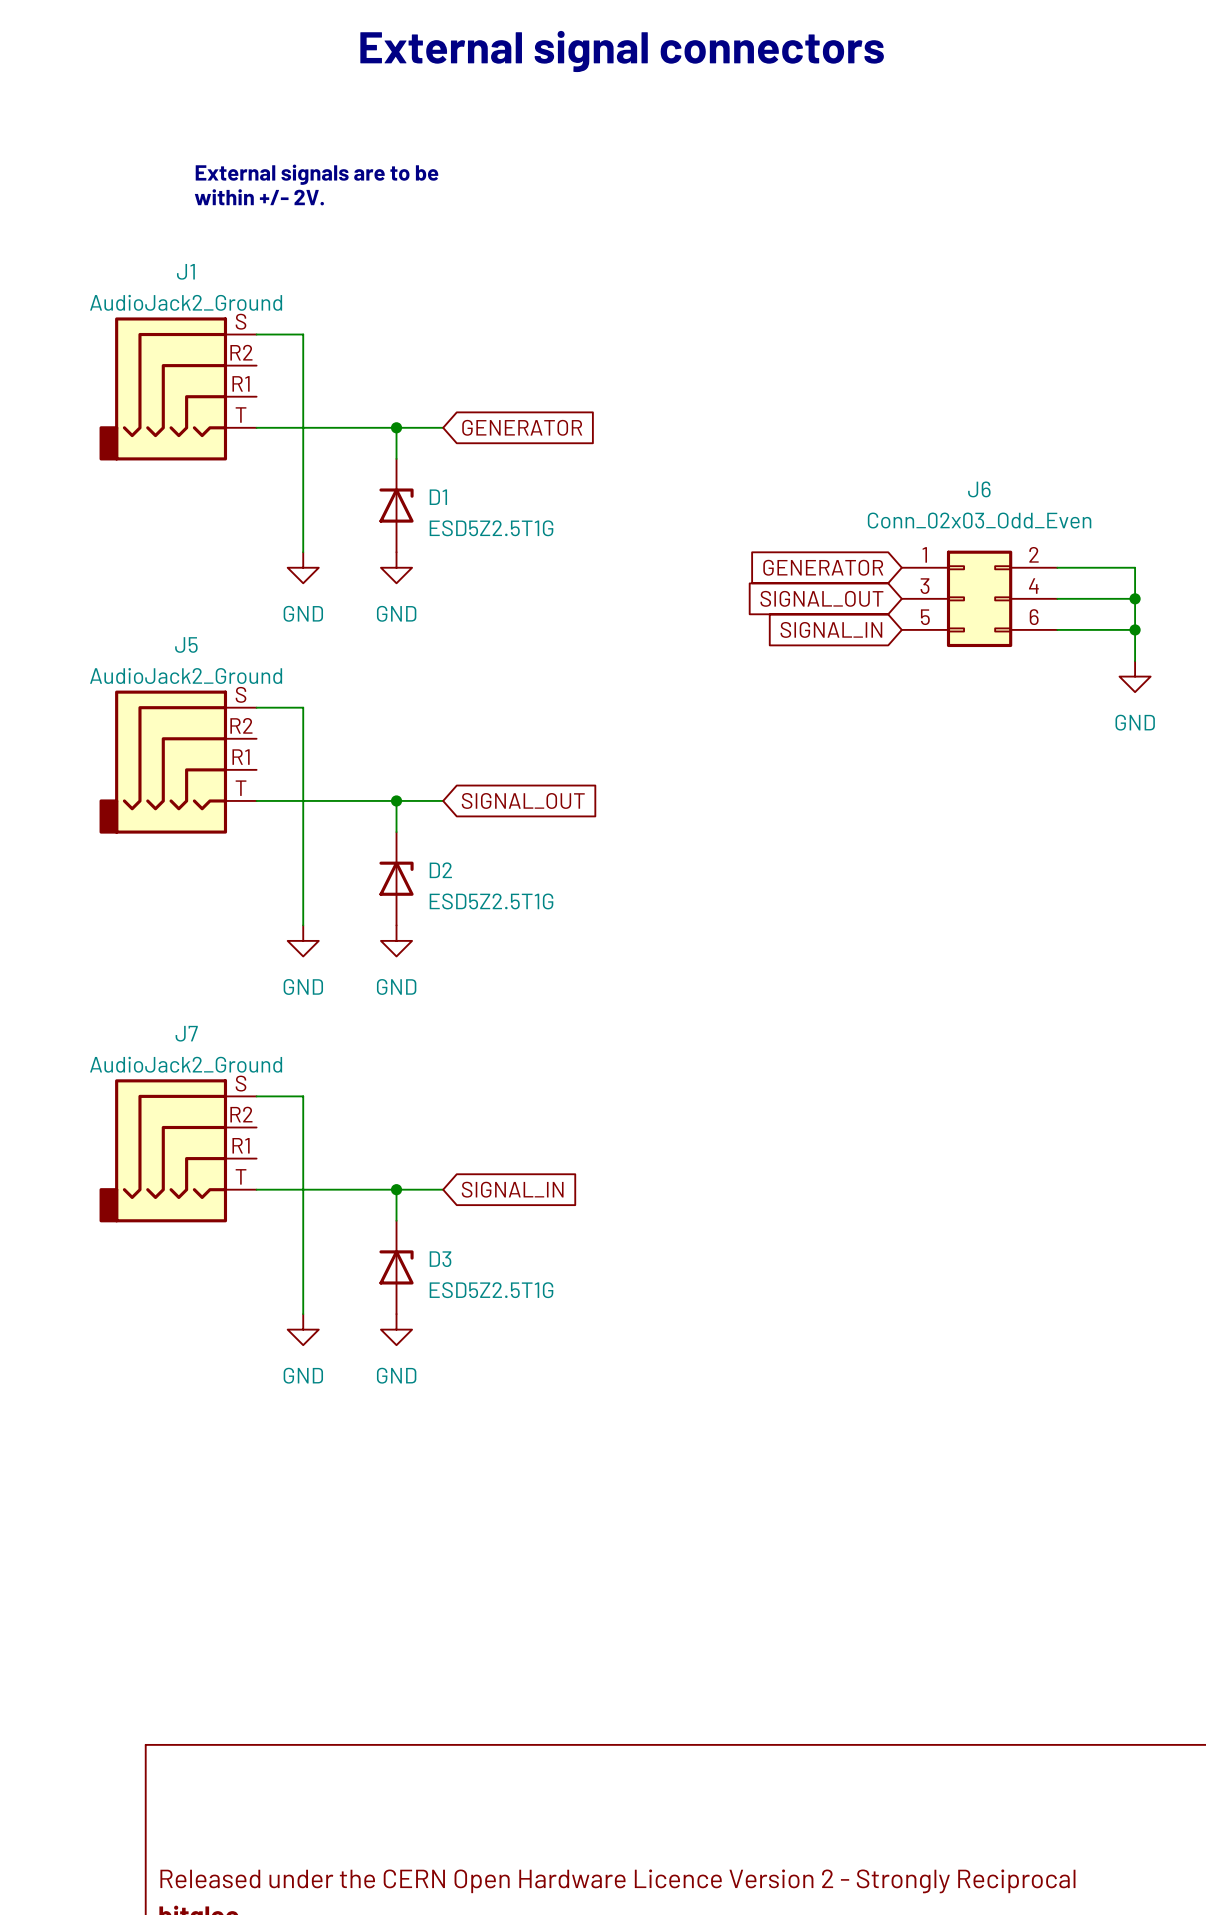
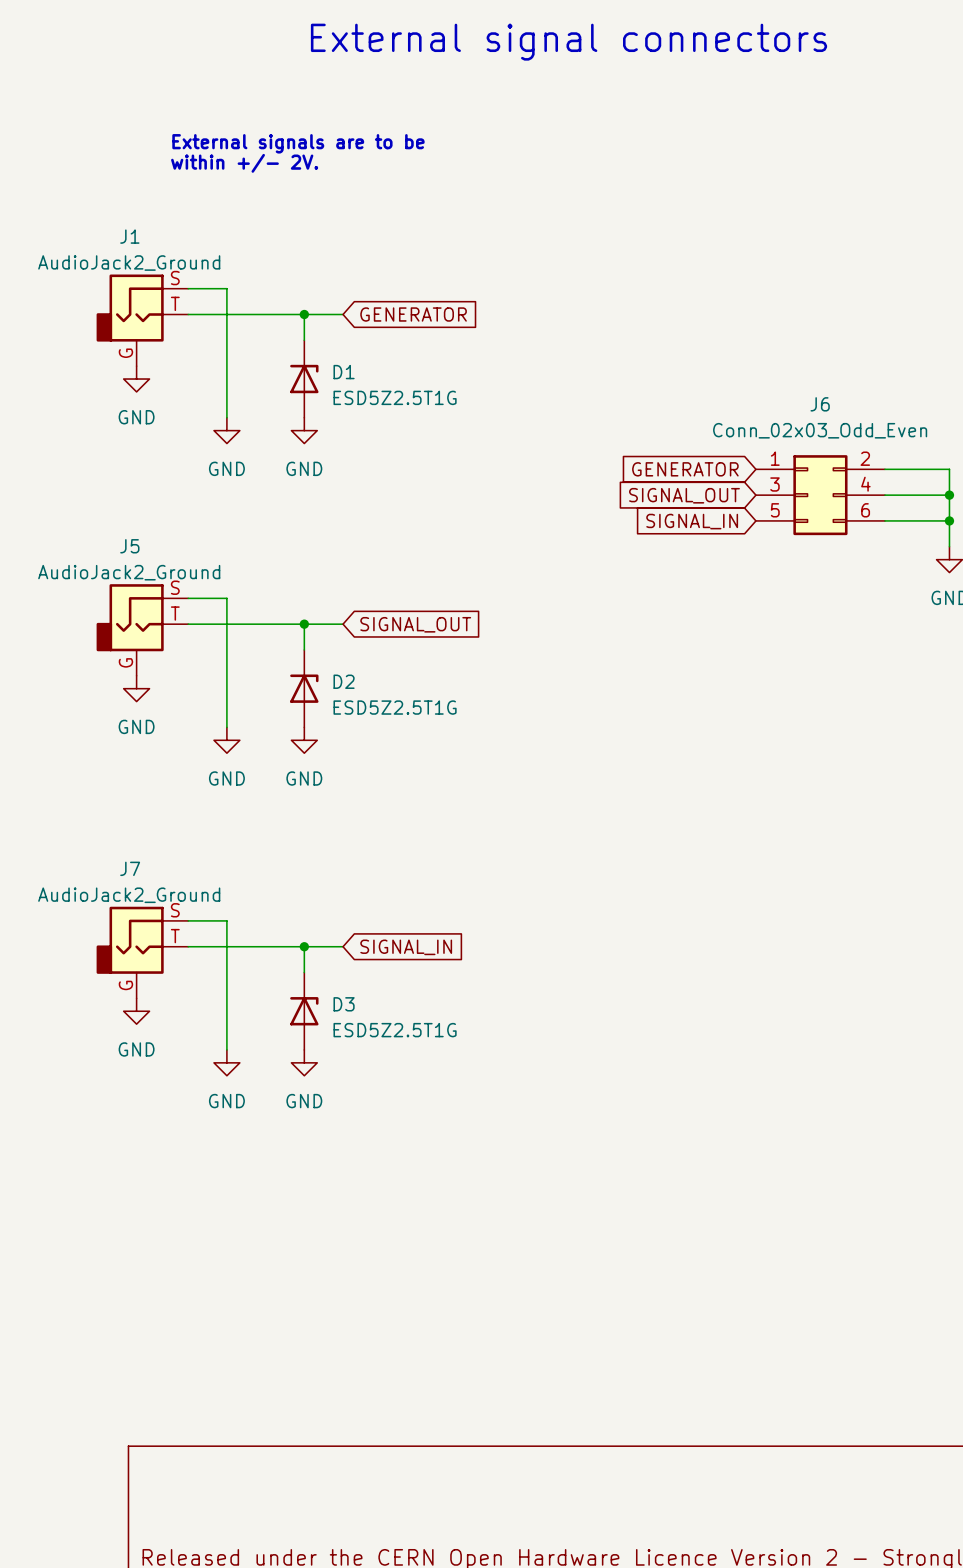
J1 name position: J1 (185, 271) -> J1 (129, 236)
J1 value position: AudioJack2_Ground (186, 302) -> AudioJack2_Ground (129, 263)
J1 symbol: [99, 317, 257, 461] -> [96, 274, 189, 367]
wire: (256, 334) (303, 334) (303, 552) -> none
wire: none -> (188, 288) (226, 288) (226, 417)
wire: (256, 427) (443, 427) -> (188, 314) (343, 314)
wire: (396, 427) (396, 458) -> (304, 314) (304, 340)
junction position: (396, 427) -> (304, 314)
global label position: GENERATOR (522, 427) -> GENERATOR (413, 314)
power symbol: none -> GND (136, 379)
D1 position: (396, 505) -> (304, 379)
power symbol: none -> GND (226, 430)
power symbol: none -> GND (304, 430)
power symbol: GND (303, 567) -> none
power symbol: GND (396, 567) -> none
J5 name position: J5 (186, 644) -> J5 (129, 546)
J5 value position: AudioJack2_Ground (186, 675) -> AudioJack2_Ground (129, 572)
J5 symbol: [99, 690, 257, 834] -> [96, 584, 189, 676]
wire: (256, 707) (303, 707) (303, 925) -> none
wire: none -> (188, 598) (226, 598) (226, 727)
wire: (256, 800) (443, 800) -> (188, 624) (343, 624)
wire: (396, 800) (396, 832) -> (304, 624) (304, 649)
junction position: (396, 800) -> (304, 624)
global label position: SIGNAL_OUT (523, 800) -> SIGNAL_OUT (415, 624)
power symbol: none -> GND (136, 688)
D2 position: (396, 878) -> (304, 688)
power symbol: none -> GND (226, 740)
power symbol: none -> GND (304, 740)
power symbol: GND (303, 940) -> none
power symbol: GND (396, 940) -> none
J7 name position: J7 (186, 1033) -> J7 (130, 868)
J7 value position: AudioJack2_Ground (186, 1064) -> AudioJack2_Ground (129, 895)
J7 symbol: [99, 1079, 257, 1223] -> [96, 906, 189, 999]
wire: (256, 1096) (303, 1096) (303, 1314) -> none
wire: none -> (188, 920) (226, 920) (226, 1049)
wire: (256, 1189) (443, 1189) -> (188, 946) (343, 946)
wire: (396, 1189) (396, 1220) -> (304, 946) (304, 972)
junction position: (396, 1189) -> (304, 946)
global label position: SIGNAL_IN (512, 1189) -> SIGNAL_IN (406, 947)
power symbol: none -> GND (136, 1011)
D3 position: (396, 1267) -> (304, 1011)
power symbol: none -> GND (226, 1062)
power symbol: none -> GND (304, 1062)
power symbol: GND (303, 1329) -> none
power symbol: GND (396, 1329) -> none

